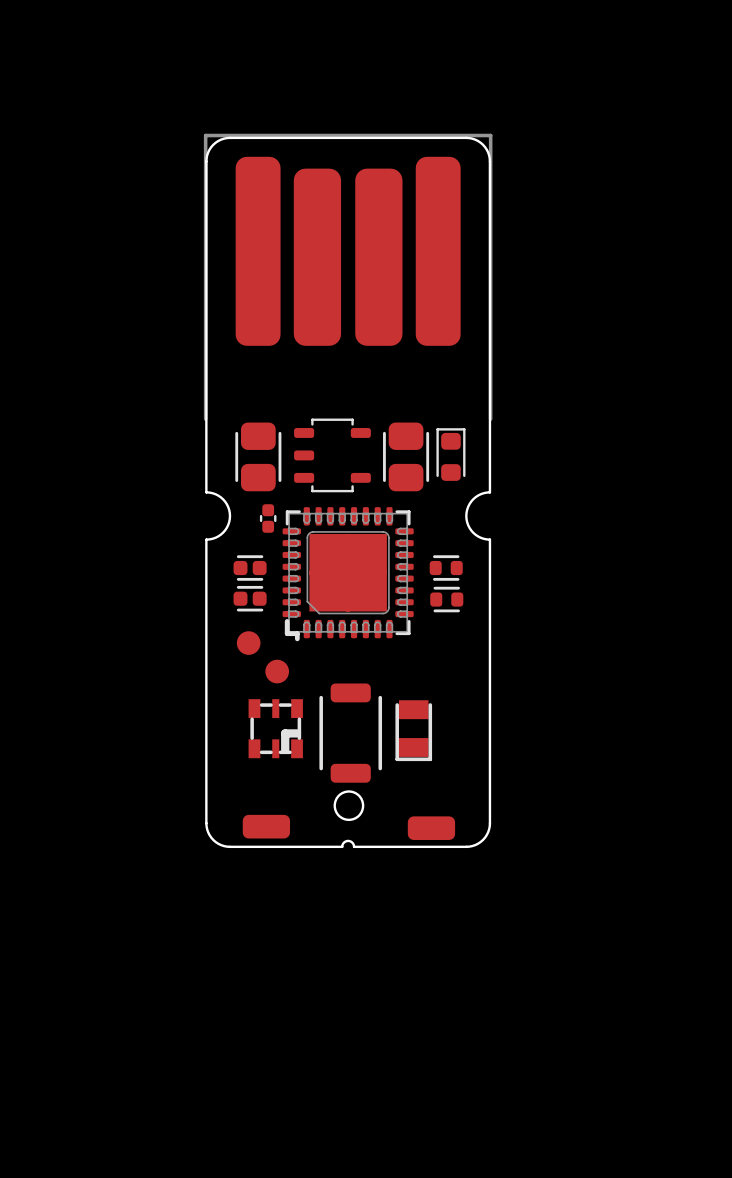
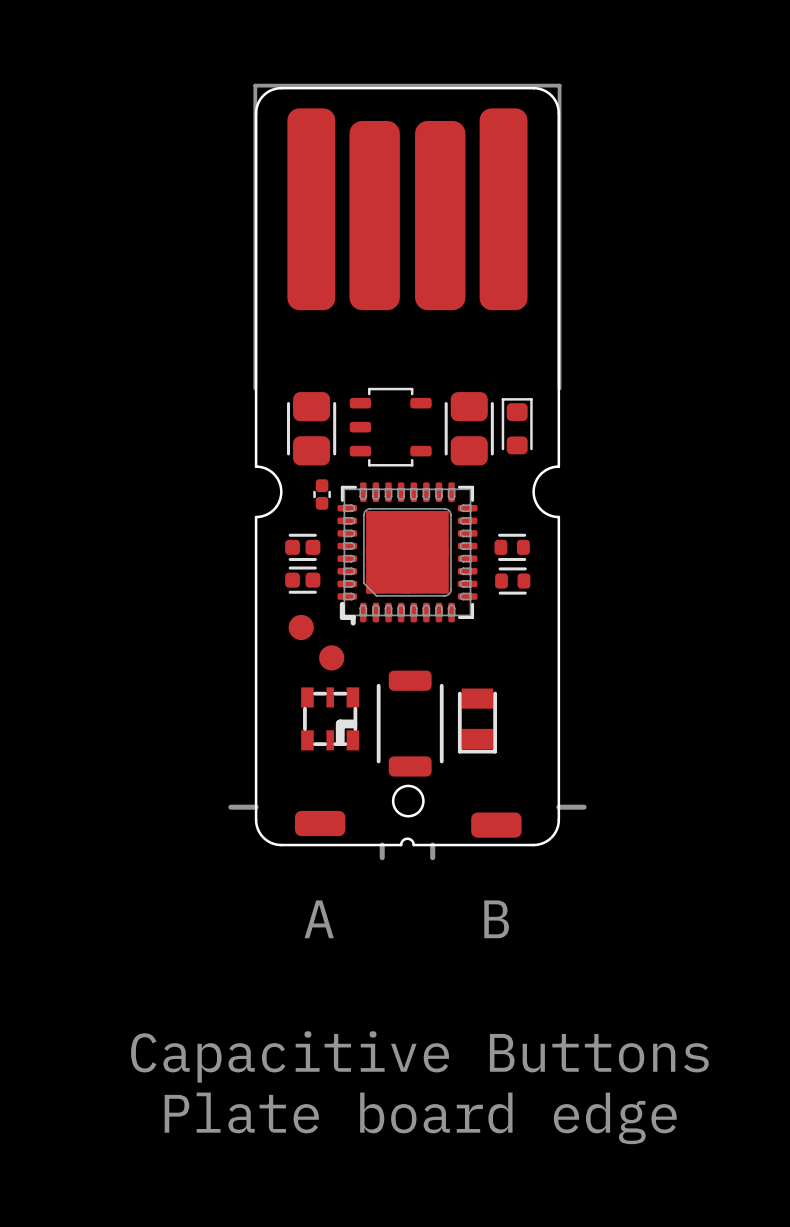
line: none -> (230, 807) (256, 807)
line: none -> (558, 807) (584, 807)
line: none -> (382, 845) (382, 857)
line: none -> (432, 845) (432, 857)
text: none -> A (319, 919)
text: none -> B (496, 919)
text: none -> Capacitive Buttons (419, 1056)
text: none -> Plate board edge (420, 1118)

